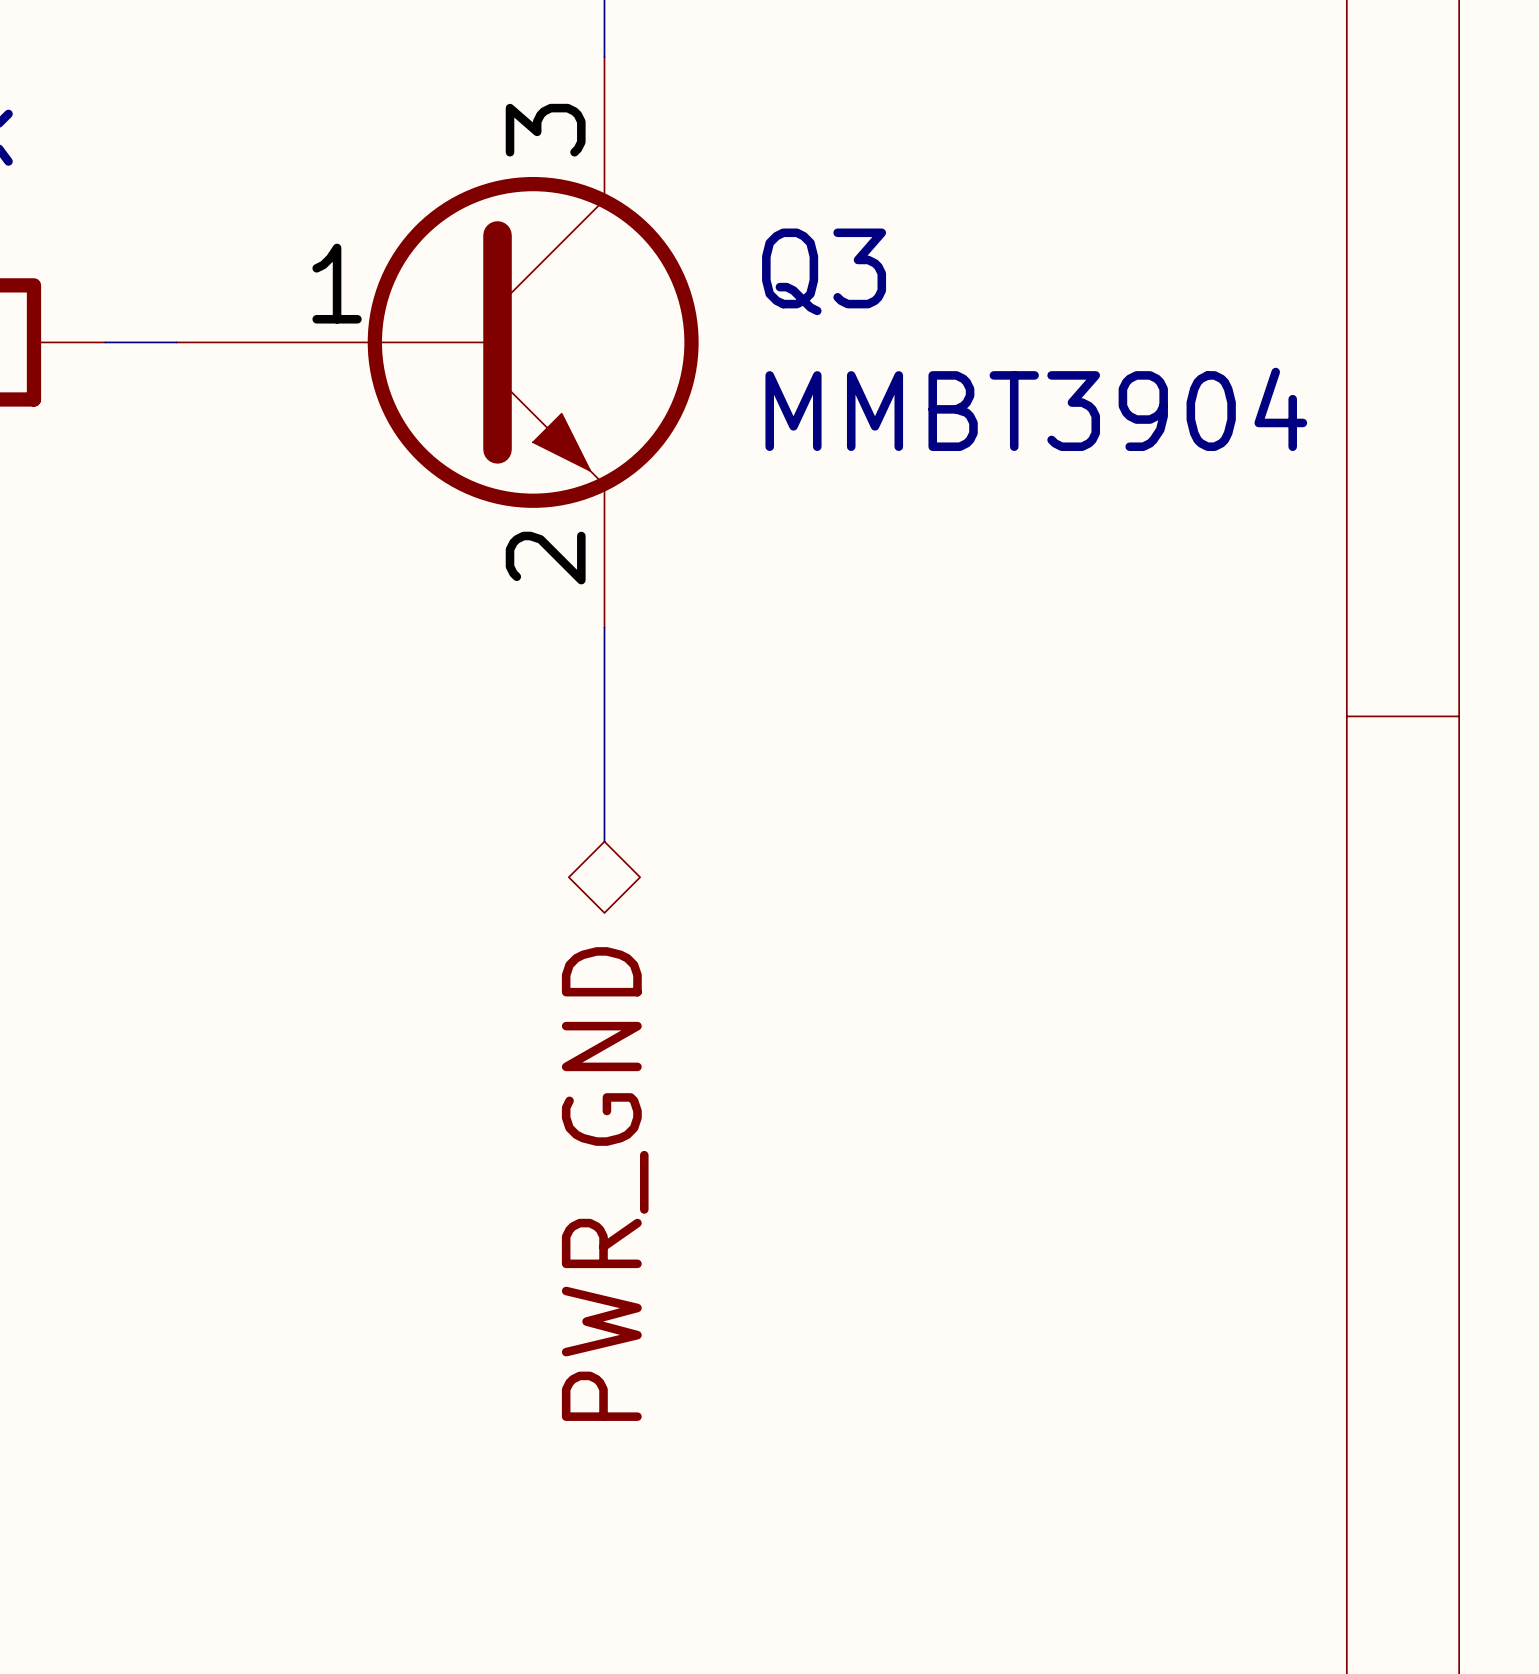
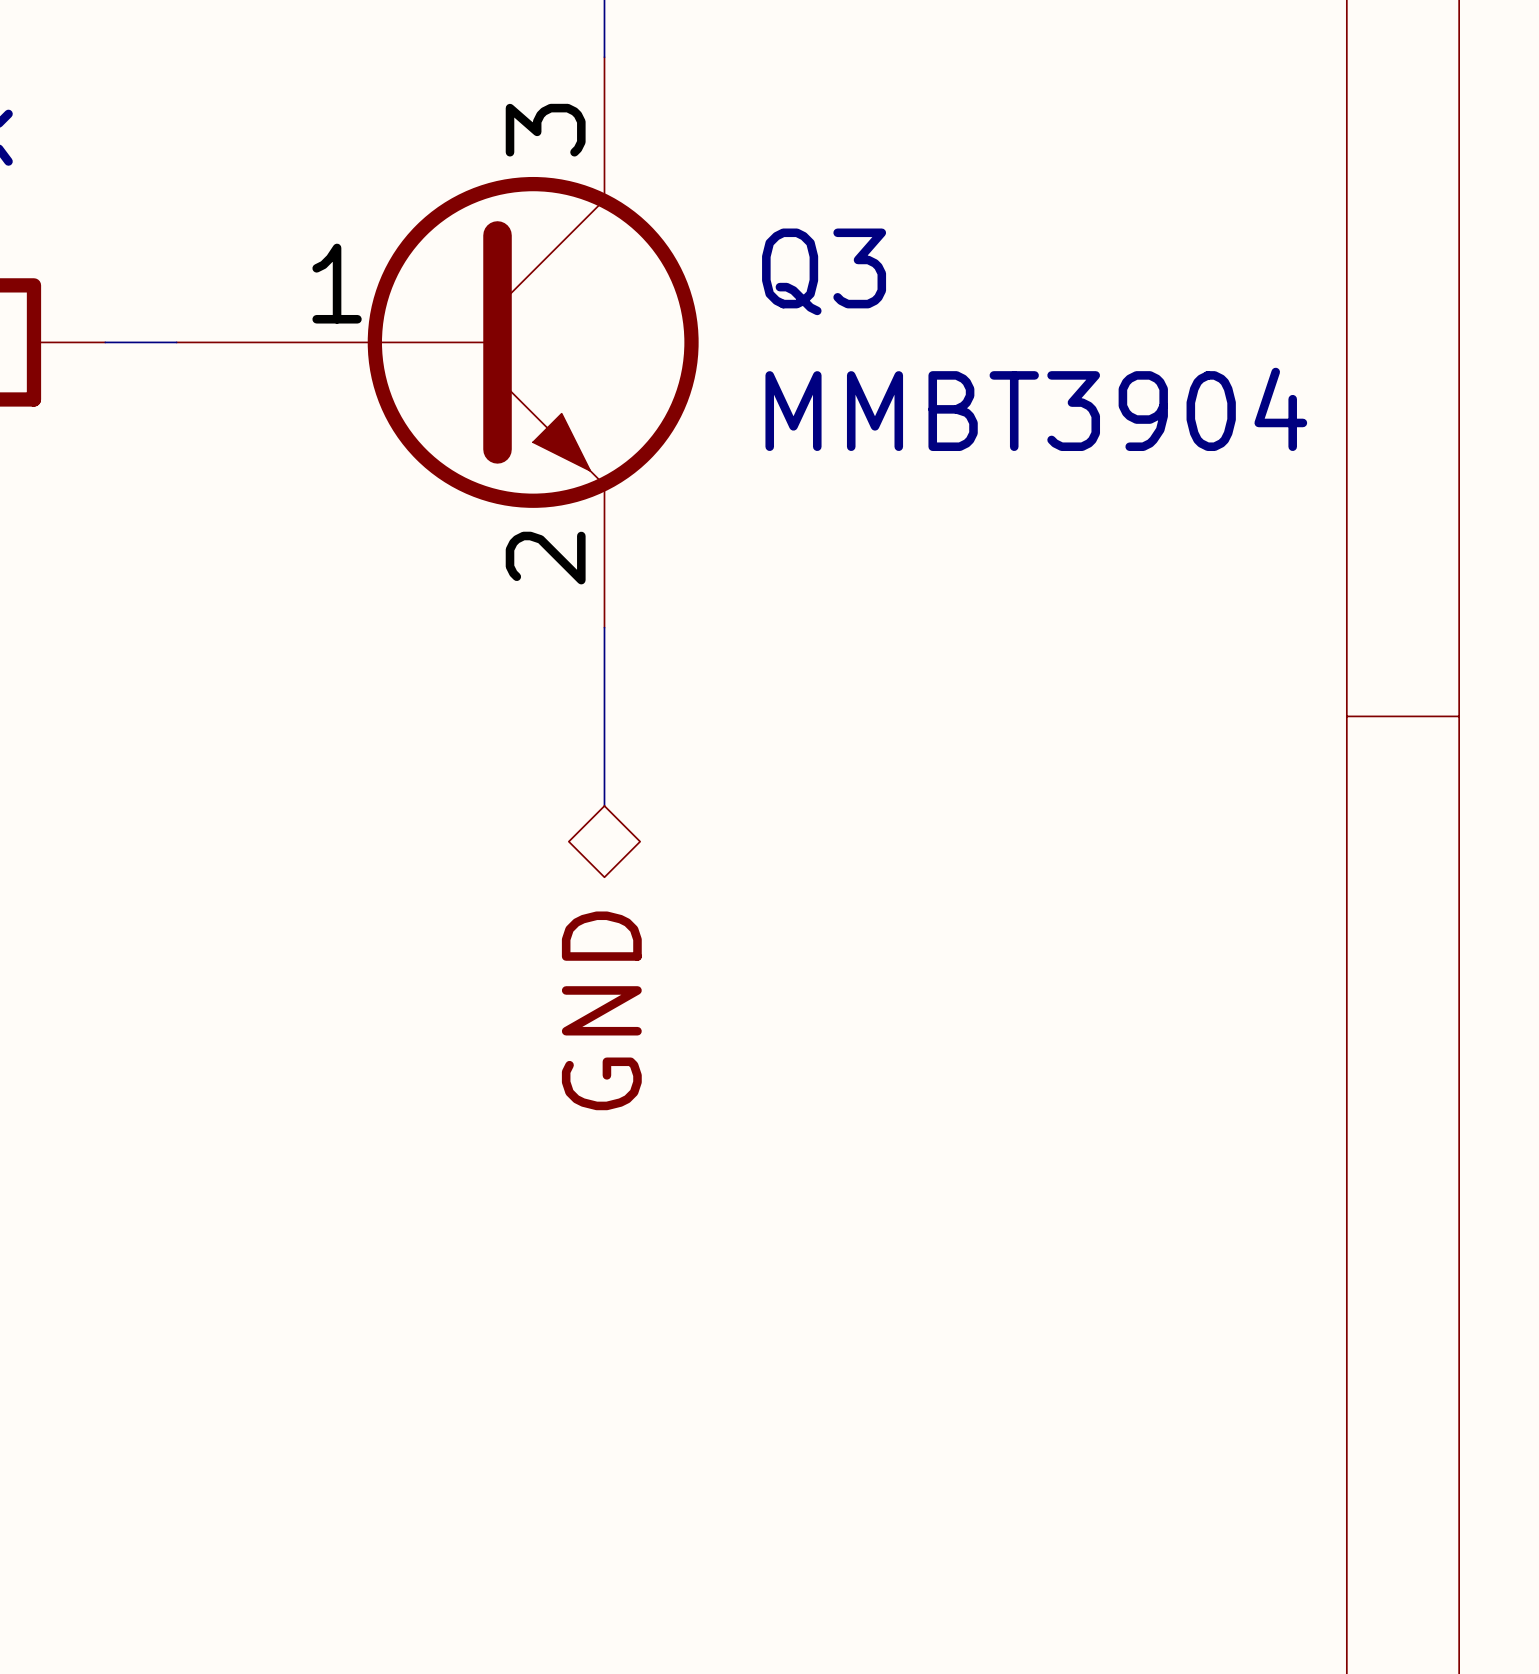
wire: (604, 805) (604, 841) -> none
hierarchical label: PWR_GND (605, 1184) -> GND (601, 1010)

